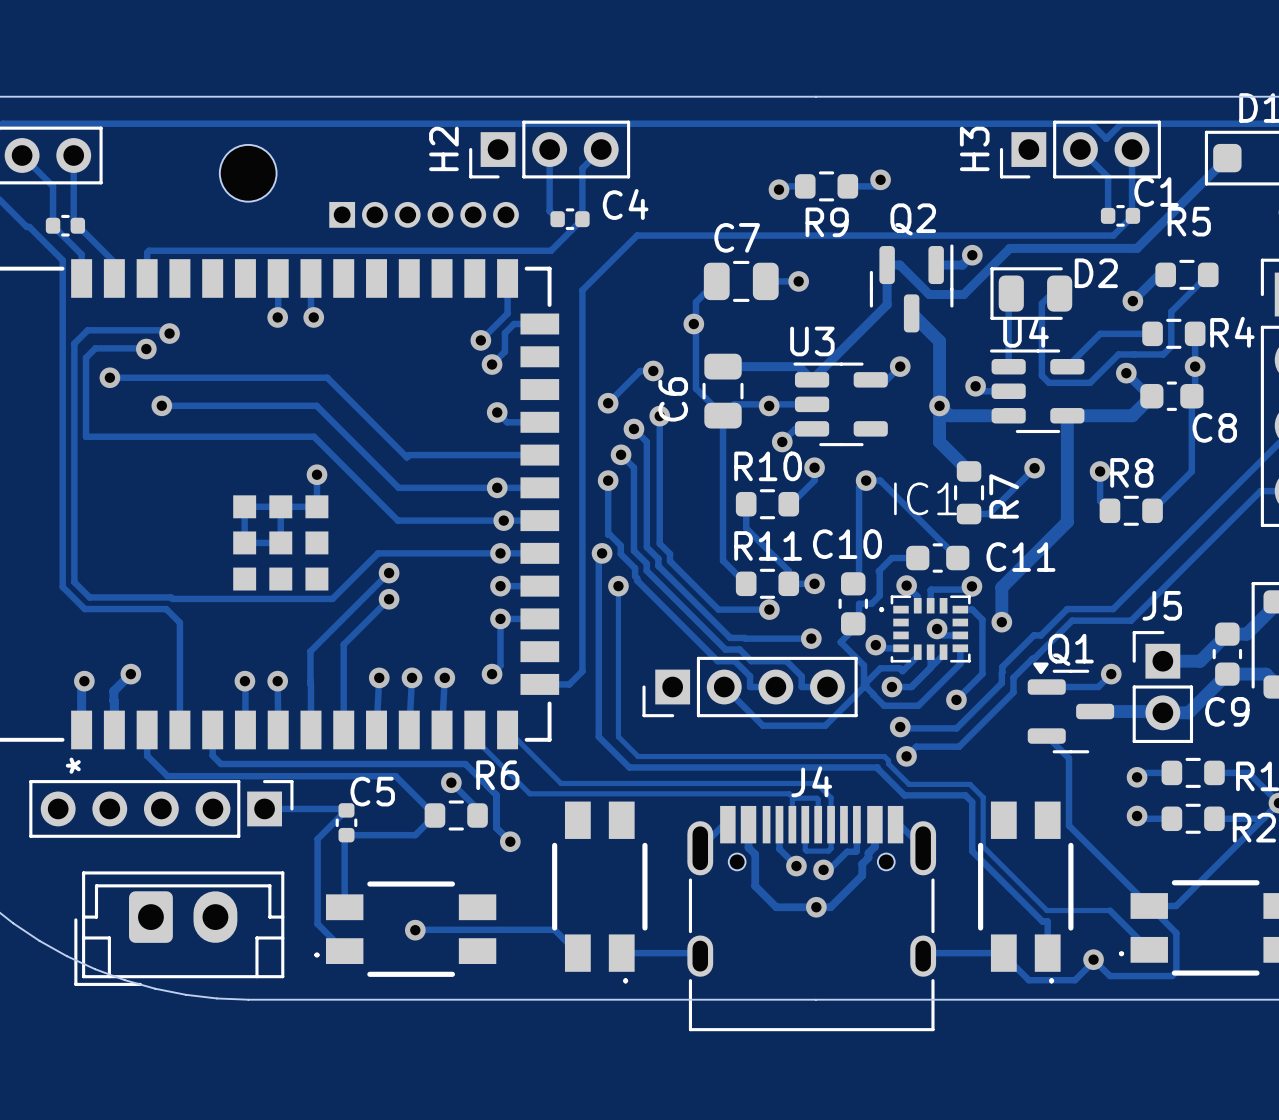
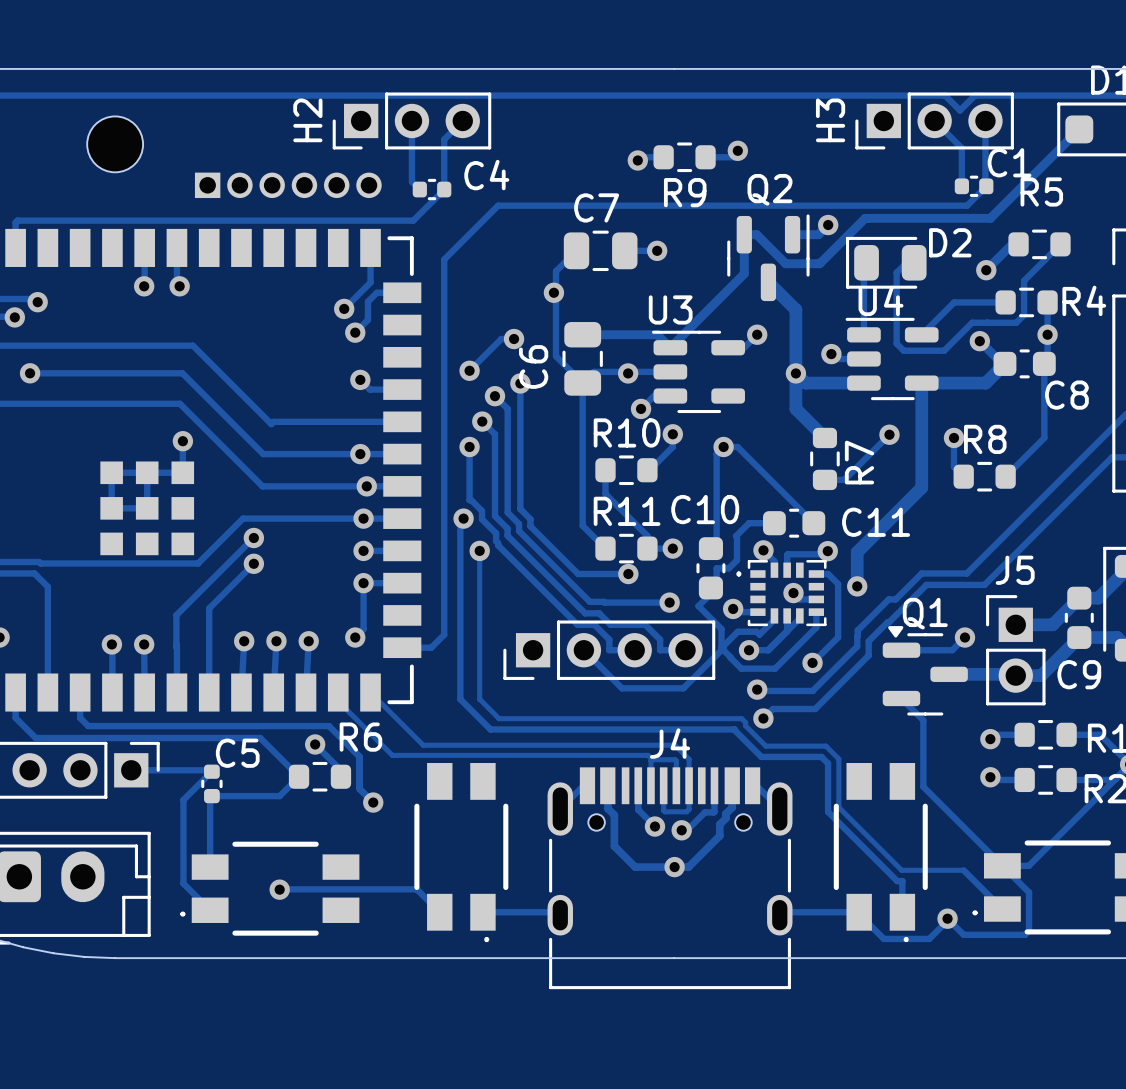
IC1 name: IC1 (925, 498) -> none

